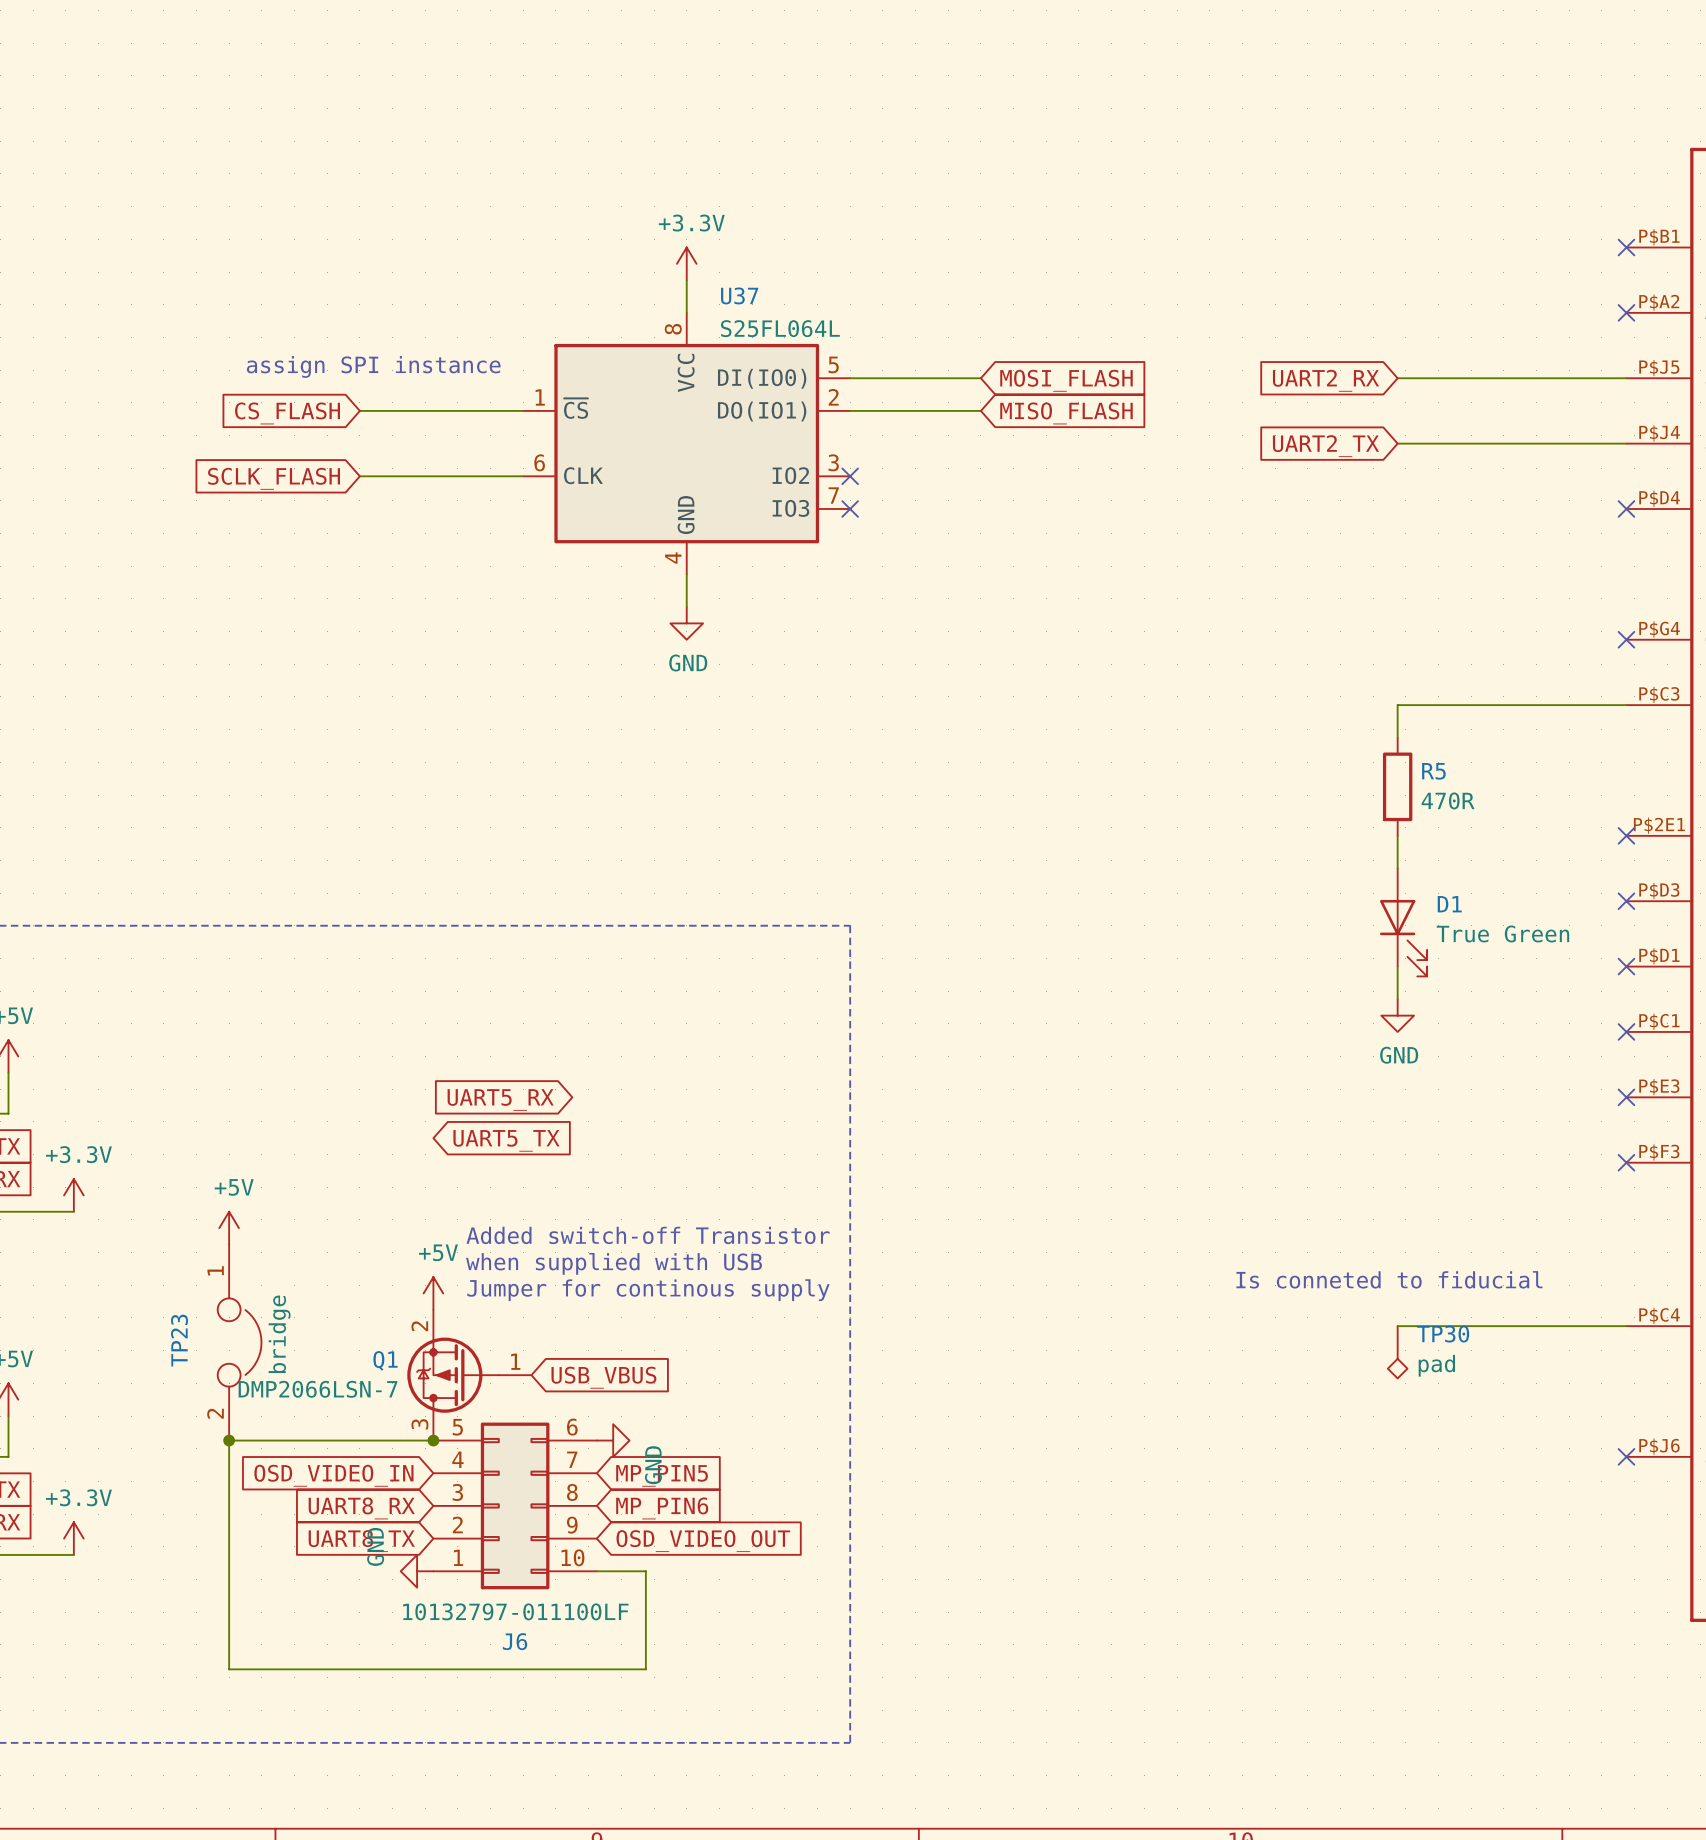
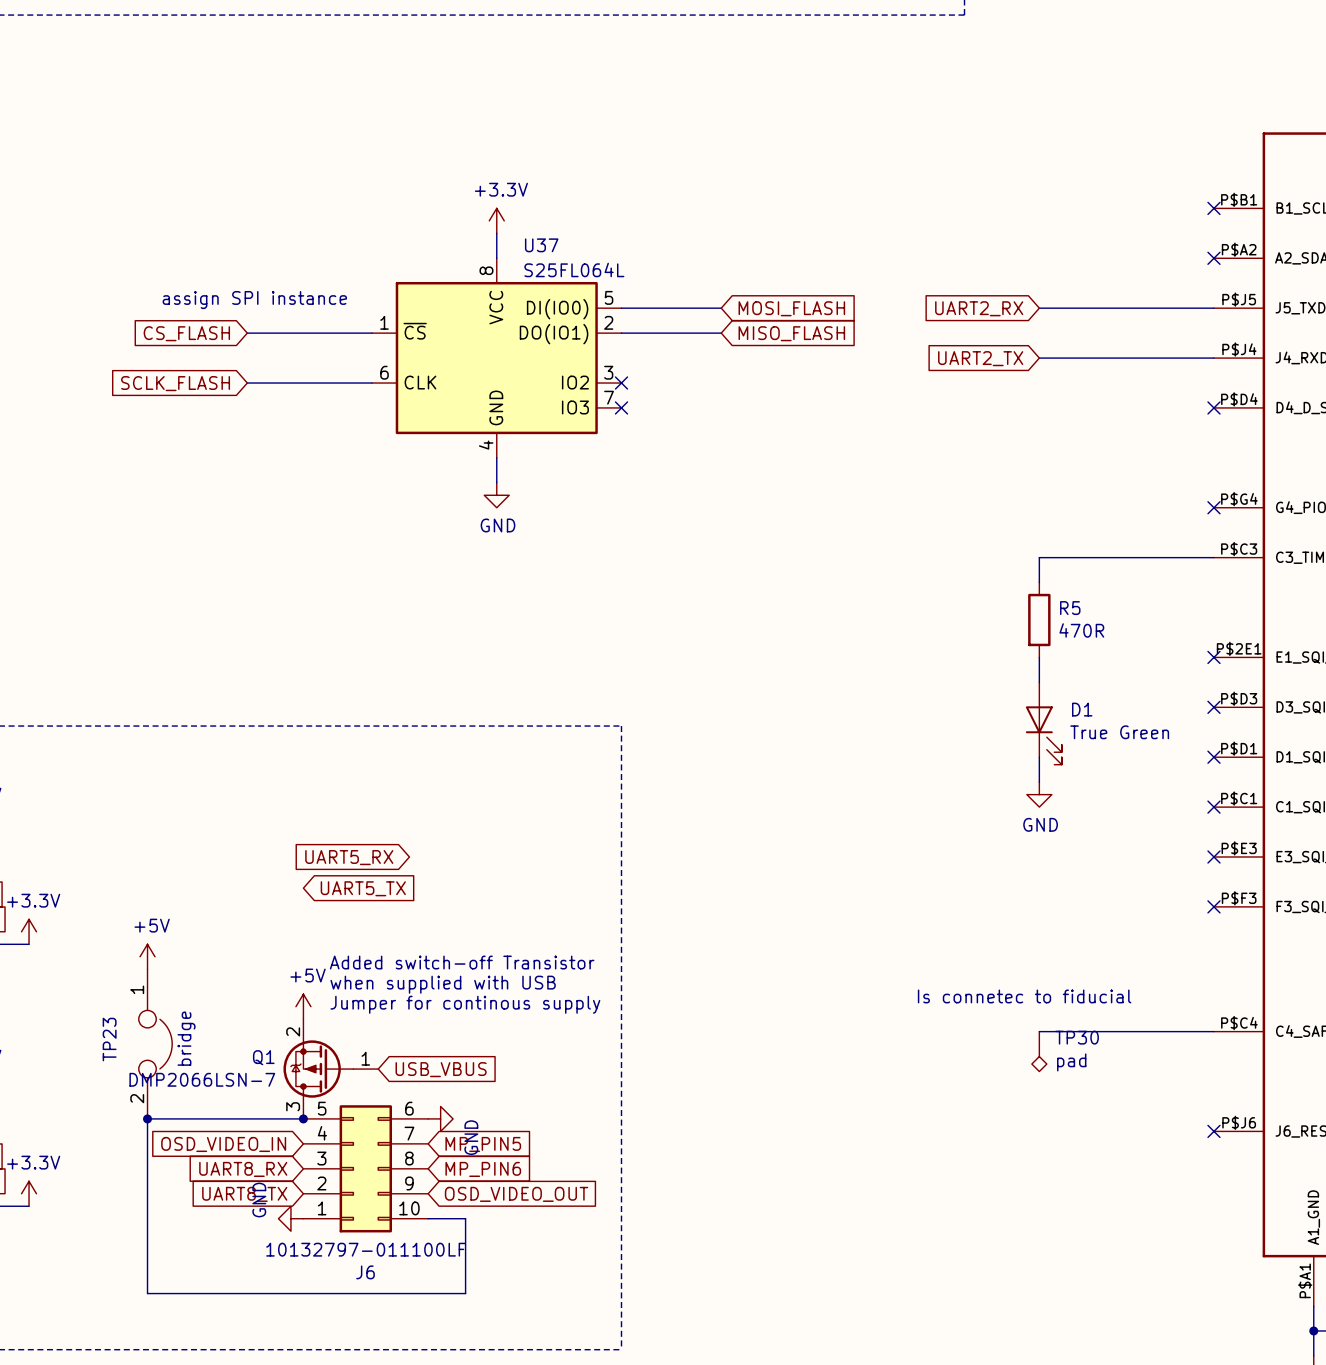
text: Is conneted to fiducial (1389, 1279) -> Is connetec to fiducial (1024, 996)

